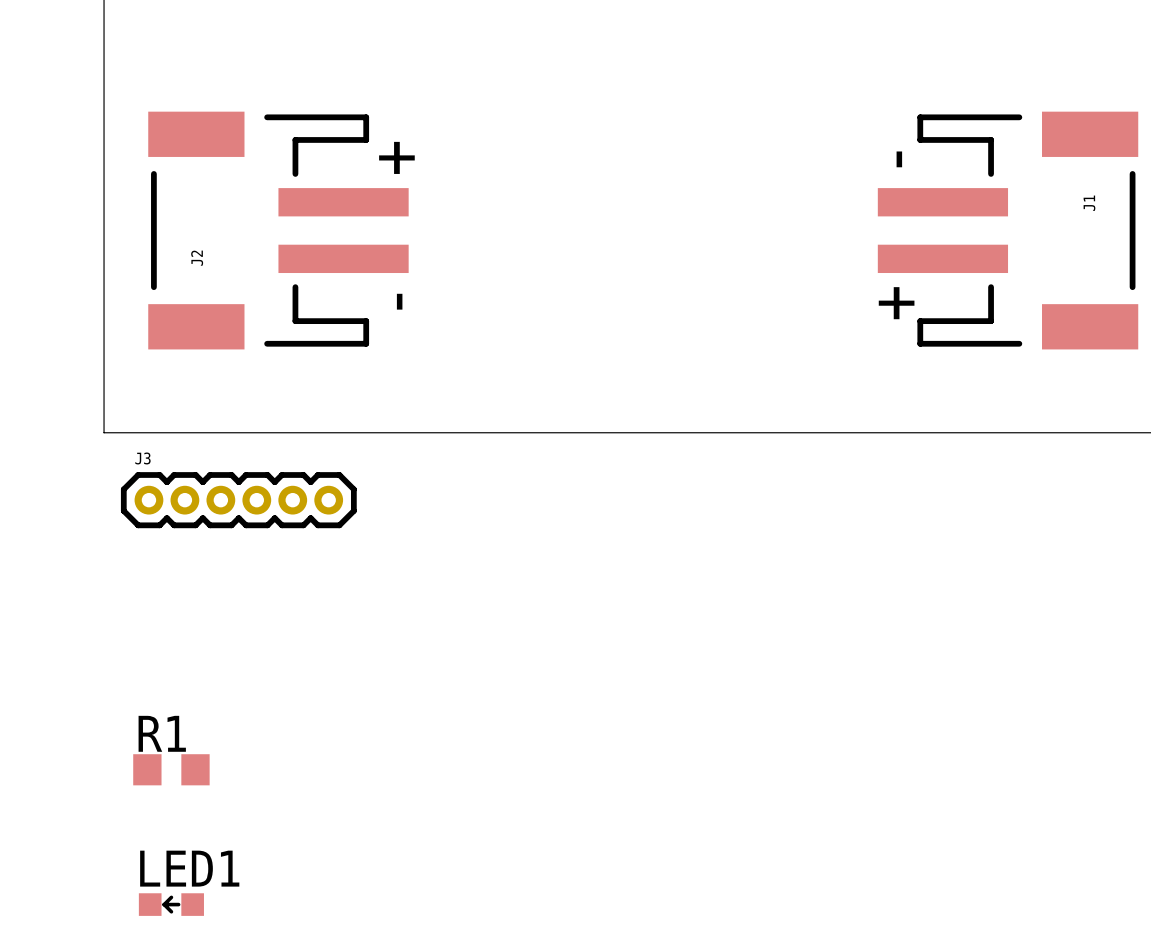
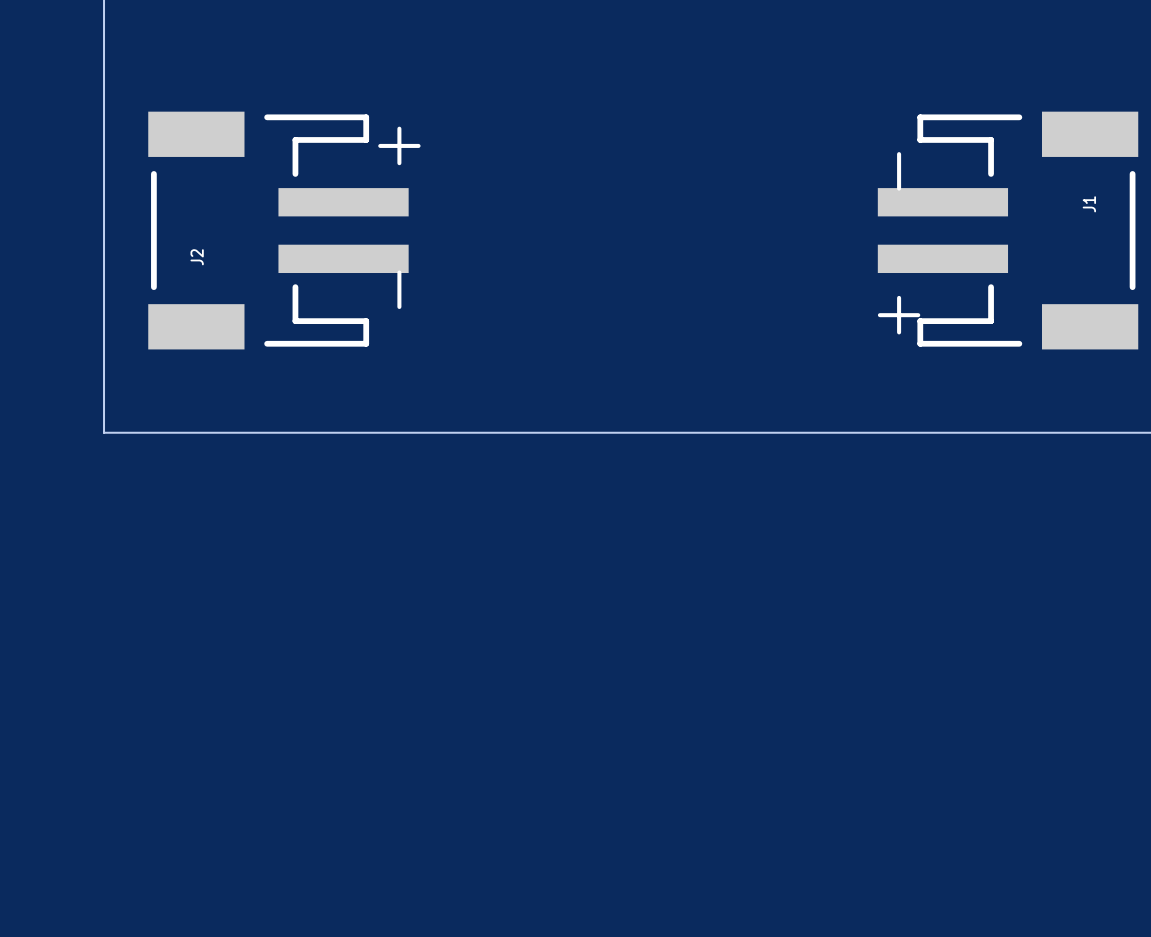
J3: (238, 500) -> none
R1: (171, 769) -> none
LED1: (171, 904) -> none

